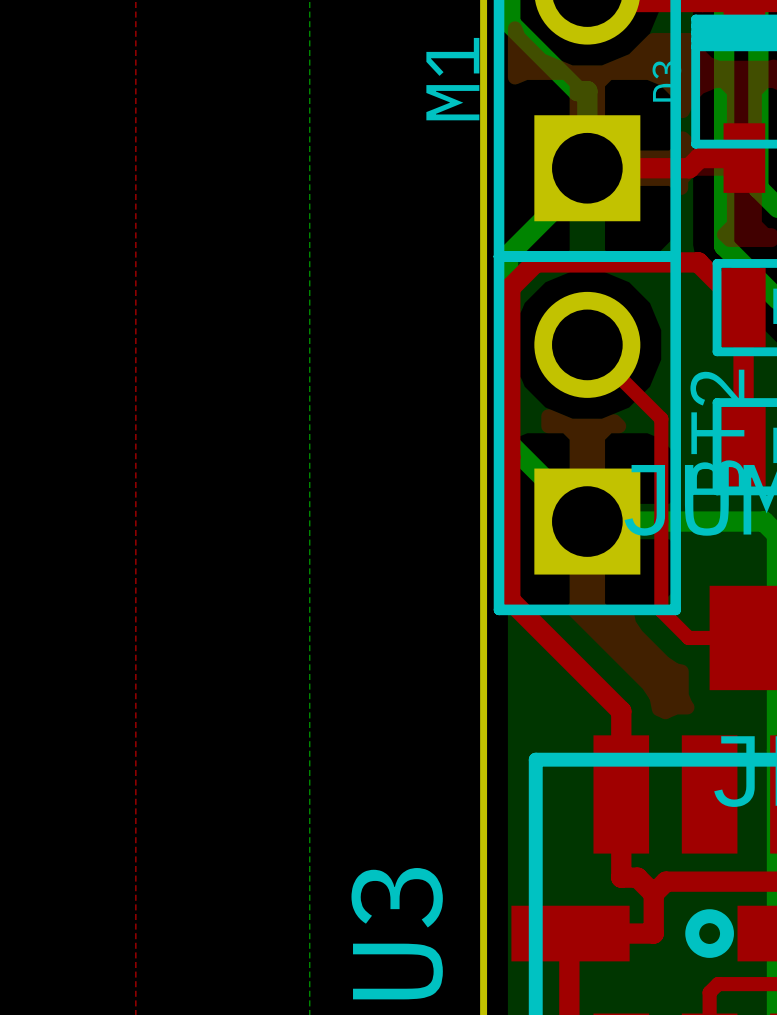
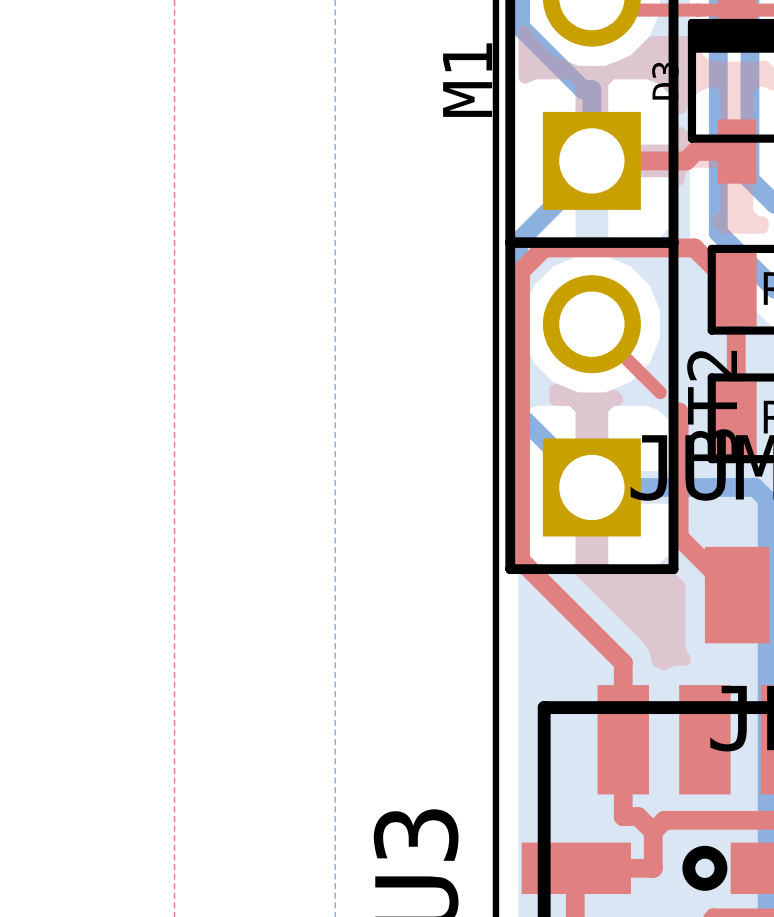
top track: (661, 418) (661, 610) (688, 637) (744, 637) -> (679, 411) (679, 537) (737, 595)

